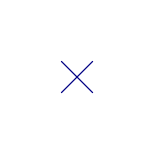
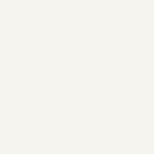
no-connect mark: (77, 77) -> none

